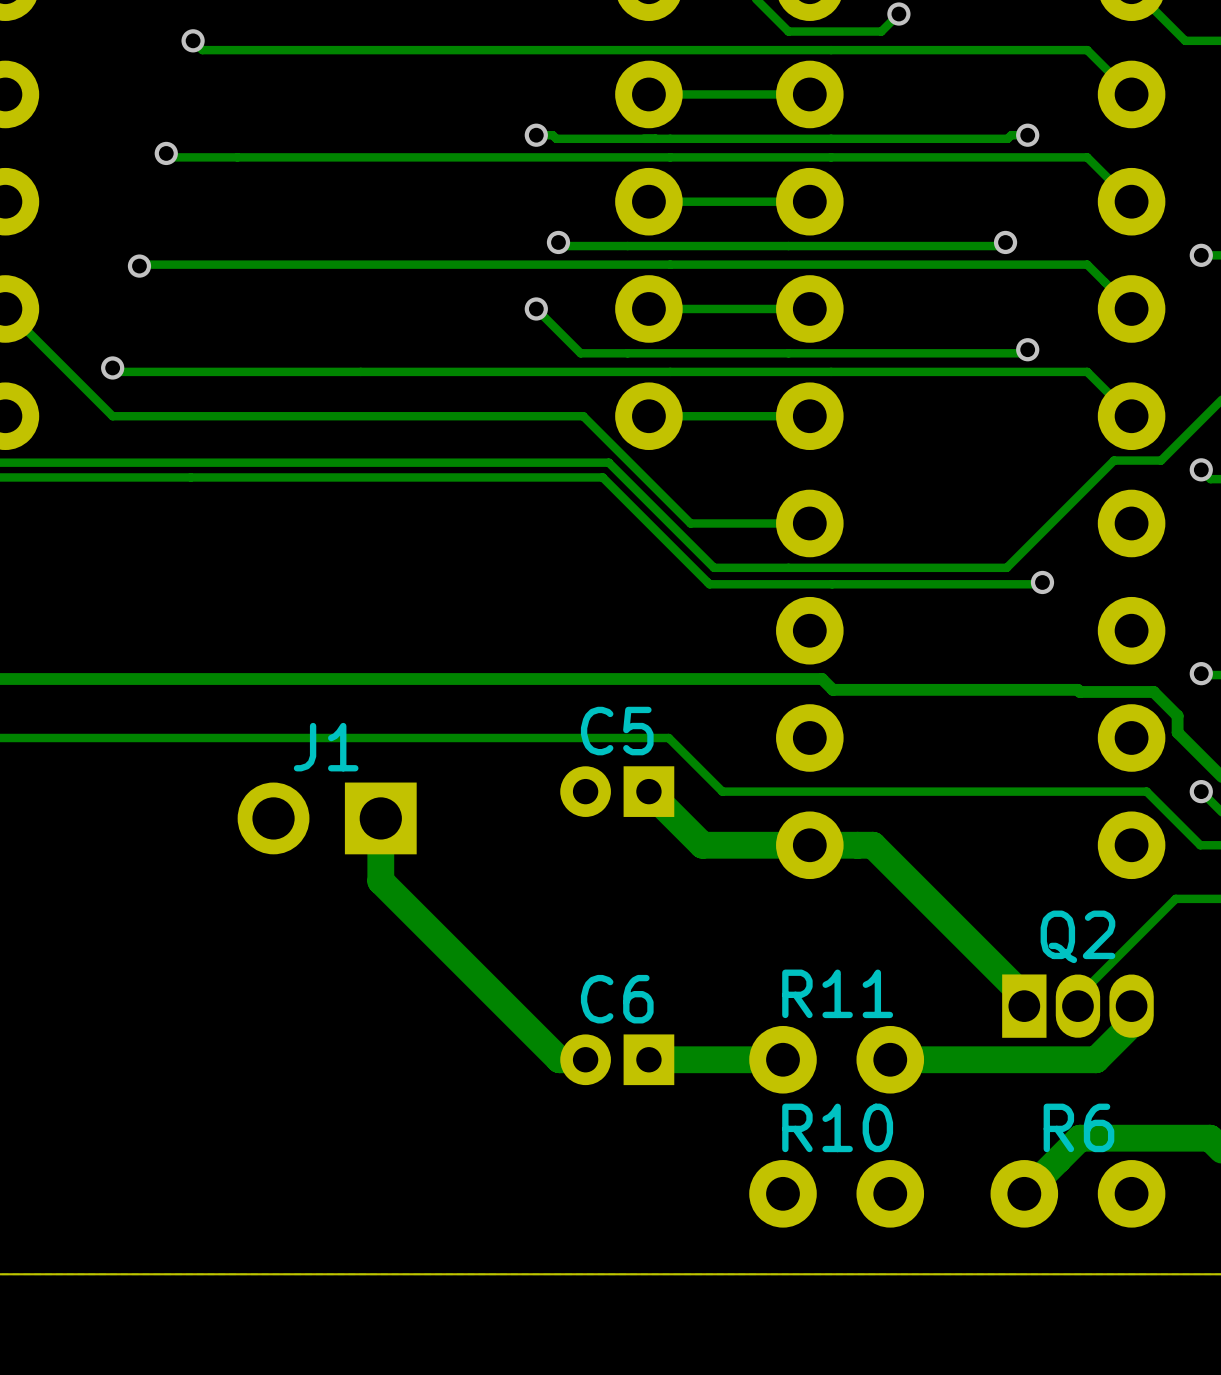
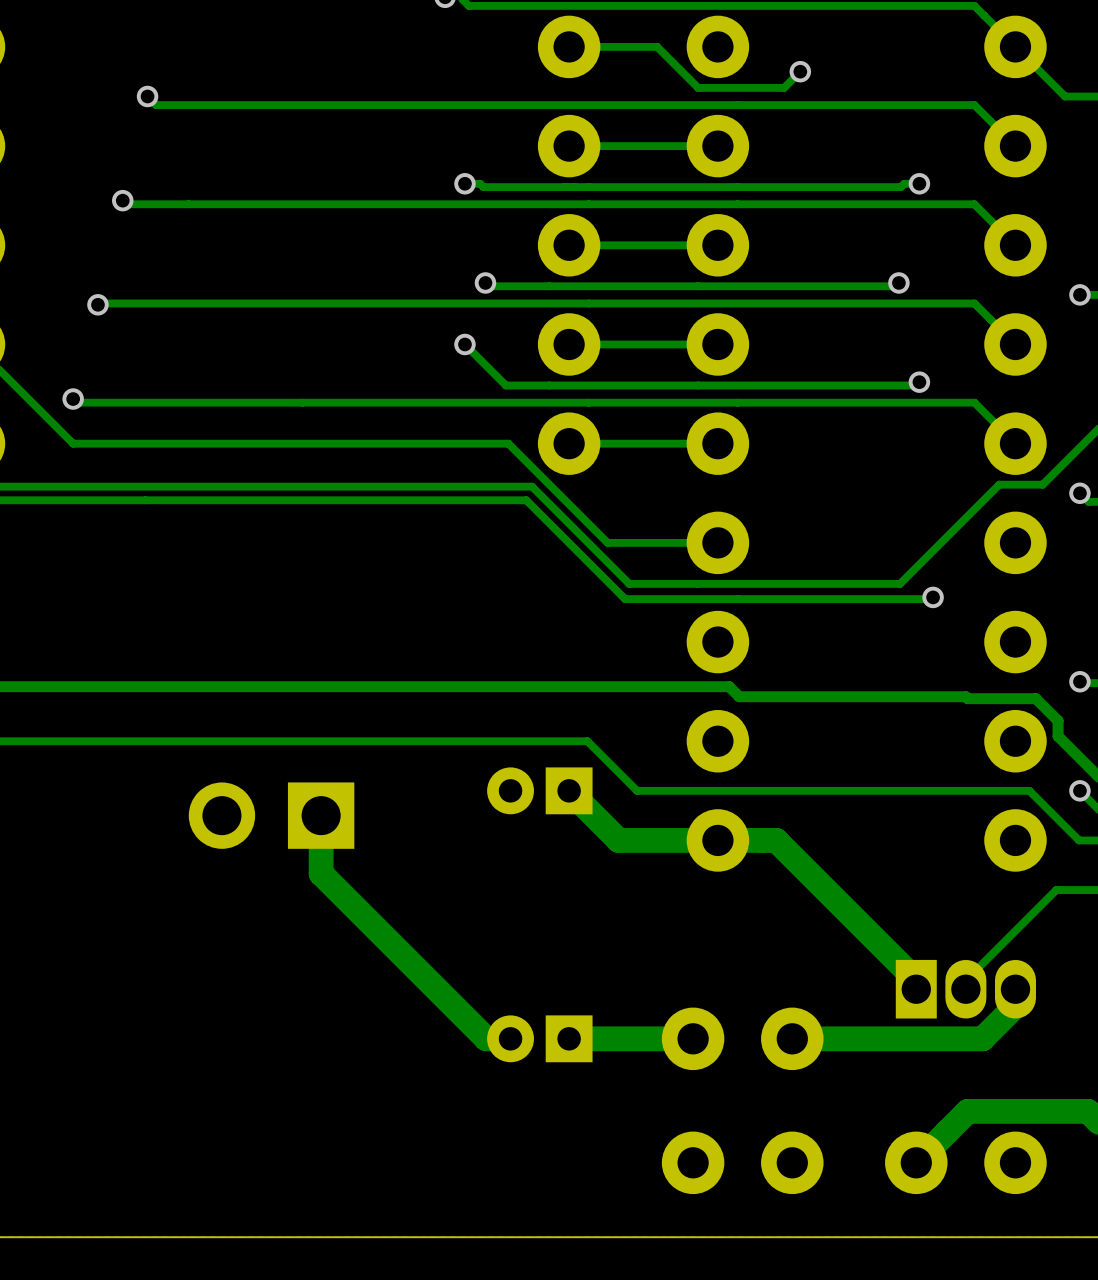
C5 name: C5 (617, 731) -> none
J1 name: J1 (326, 747) -> none
Q2 name: Q2 (1077, 936) -> none
R11 name: R11 (837, 993) -> none
C6 name: C6 (617, 999) -> none
R10 name: R10 (837, 1127) -> none
R6 name: R6 (1078, 1127) -> none

